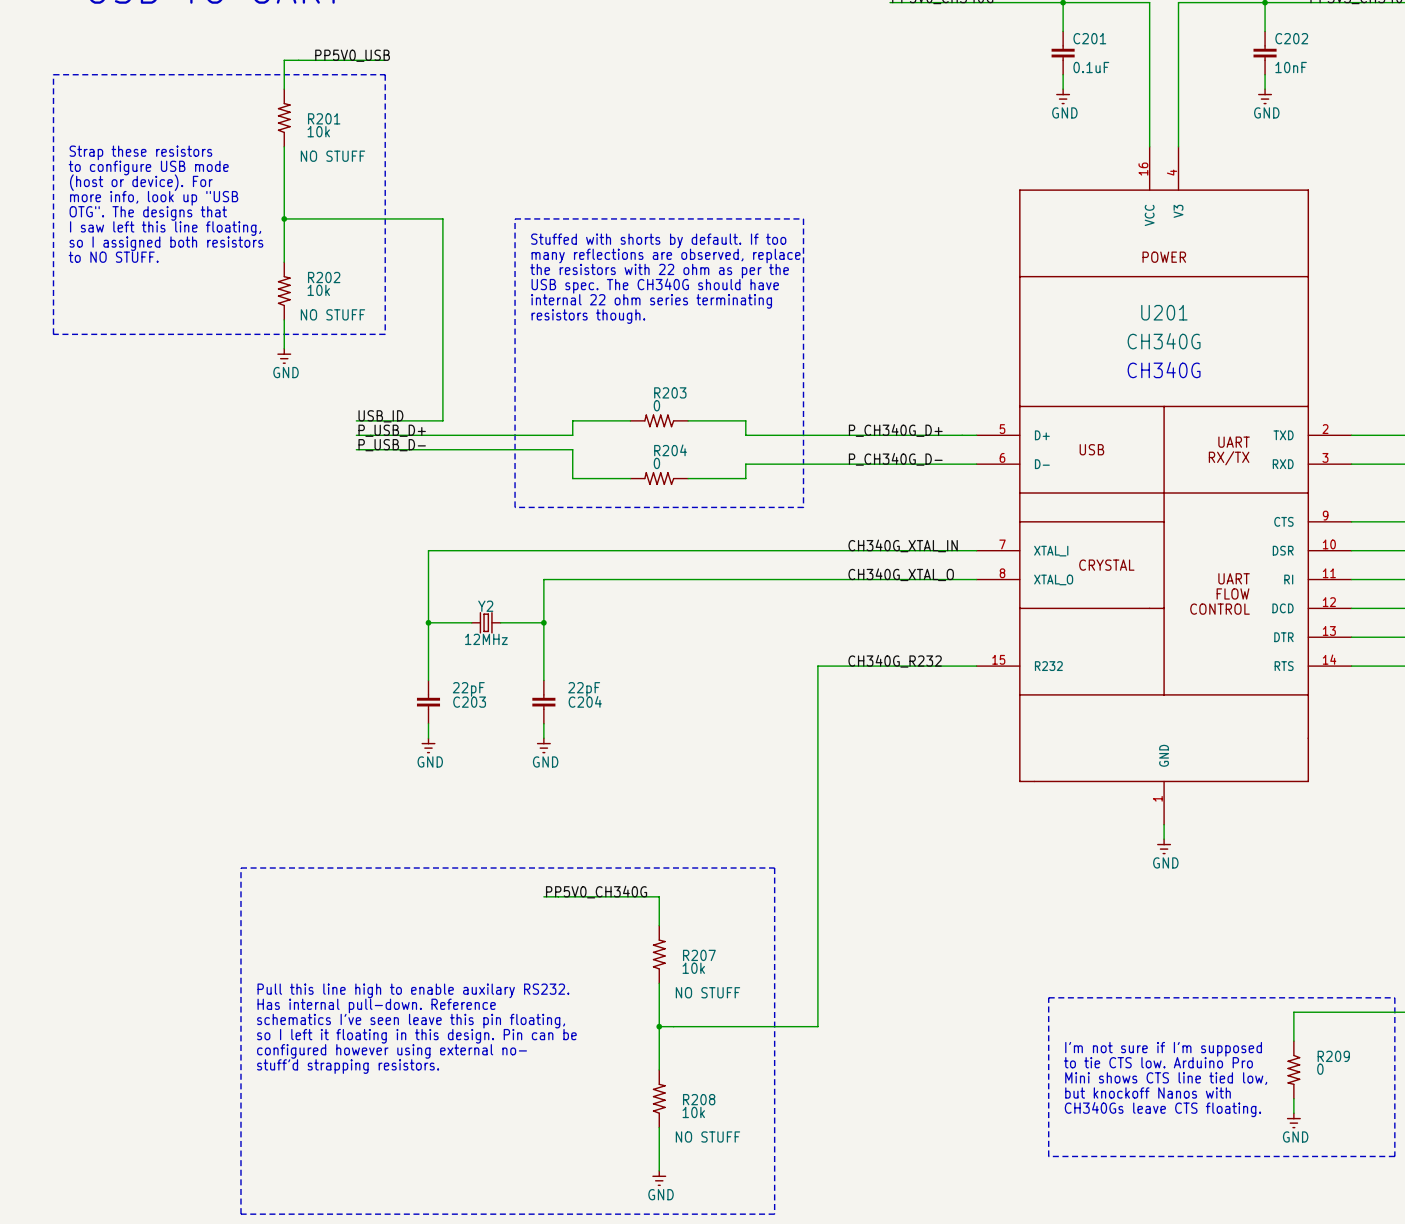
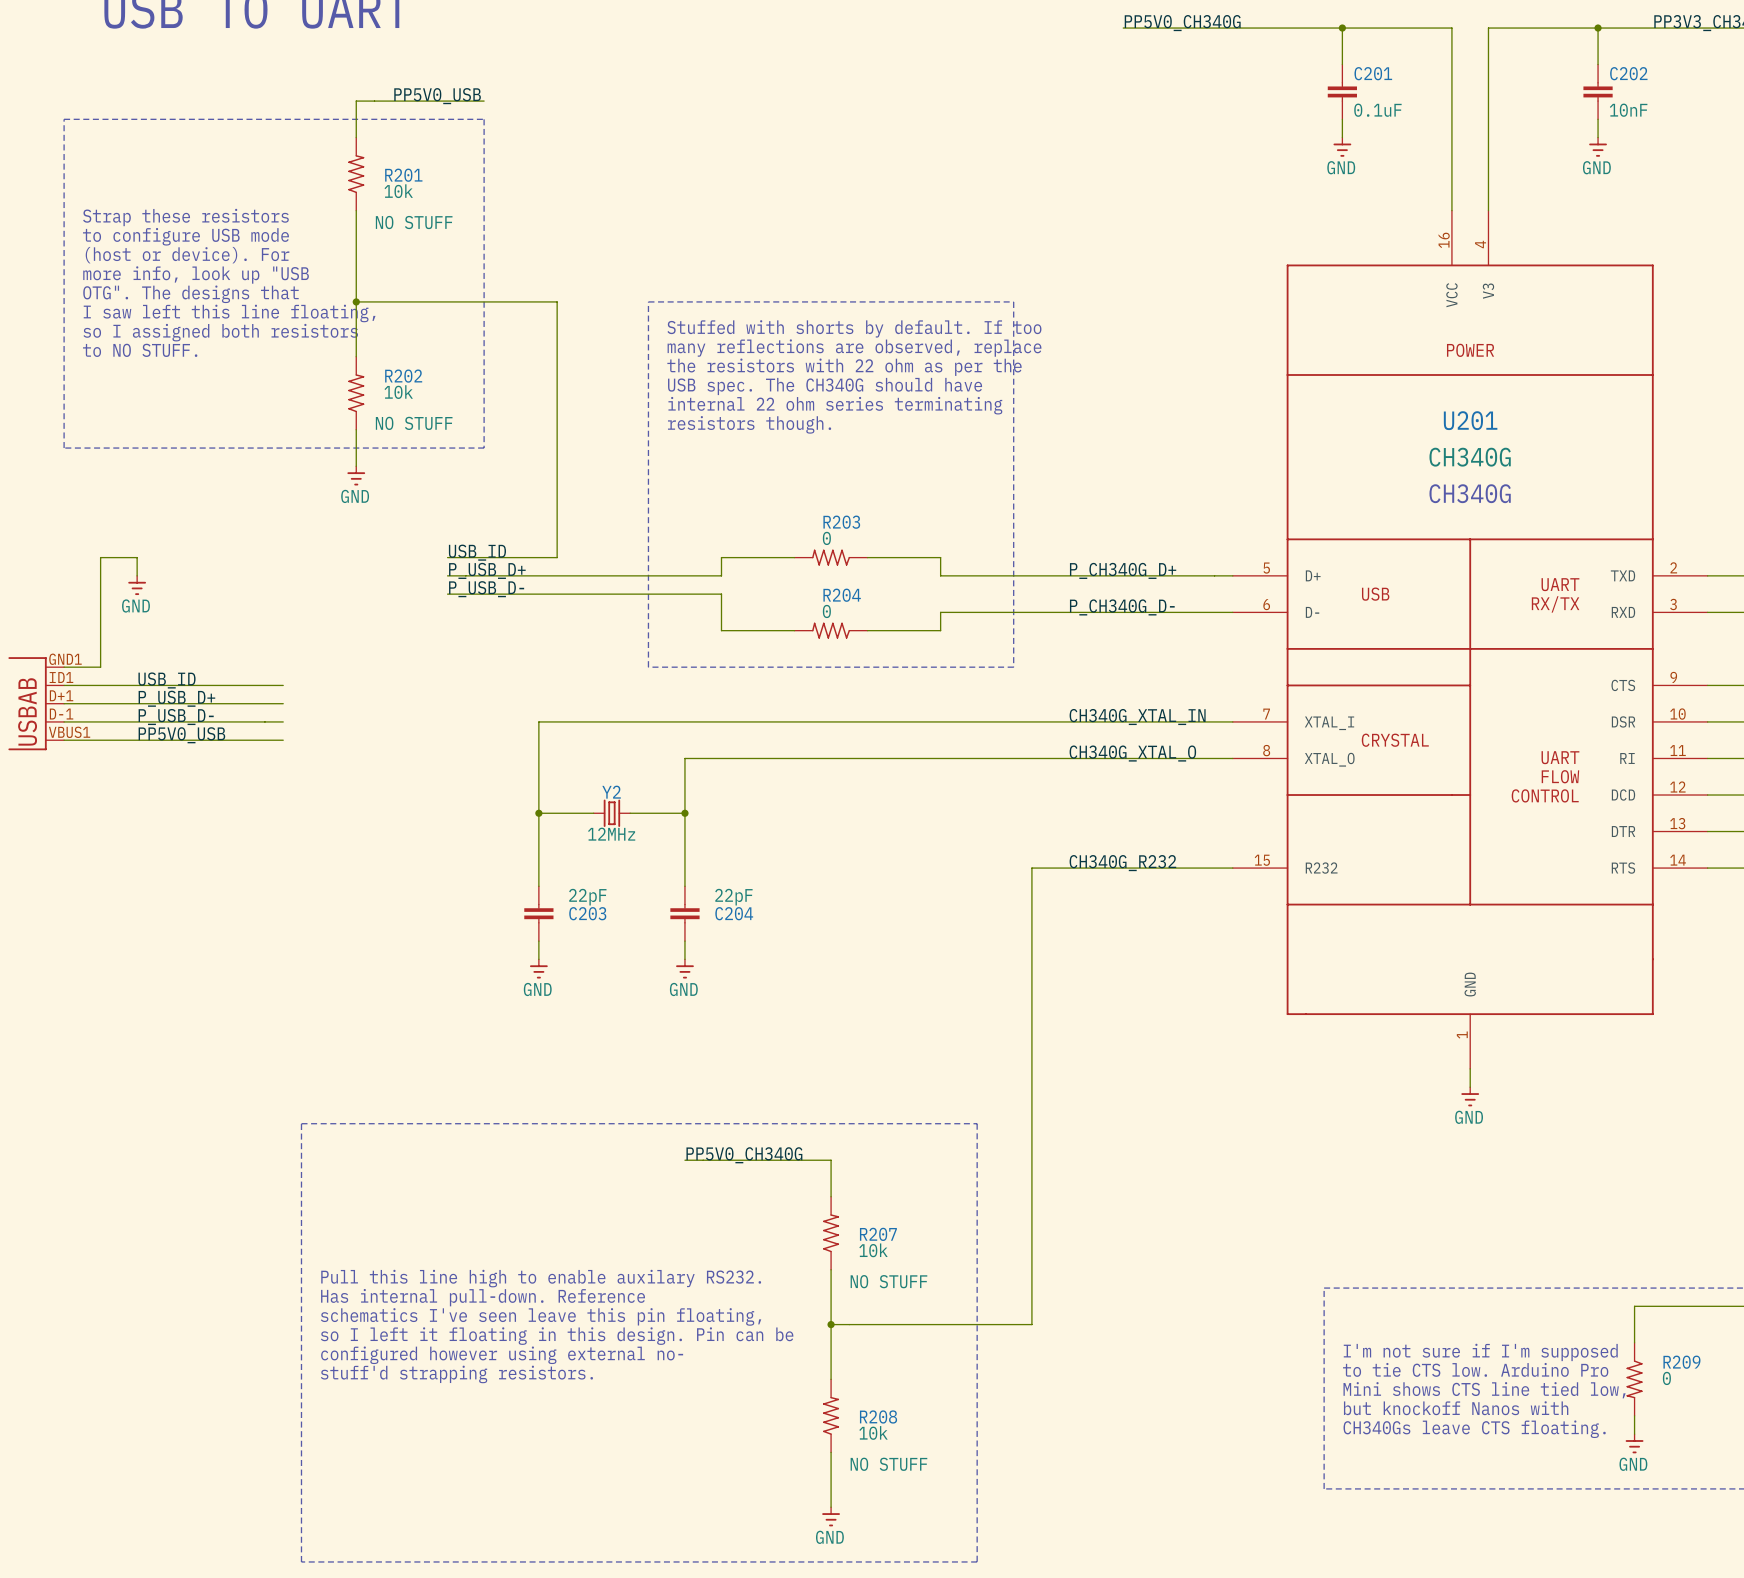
wire: none -> (137, 575) (137, 557) (100, 557) (100, 667) (64, 667)
power symbol: none -> GND (137, 585)
label: none -> USB_ID (167, 680)
wire: none -> (64, 685) (283, 685)
label: none -> P_USB_D+ (176, 698)
part: none -> (36, 703)
wire: none -> (64, 703) (283, 703)
label: none -> P_USB_D- (176, 717)
wire: none -> (64, 721) (283, 721)
label: none -> PP5V0_USB (181, 735)
wire: none -> (64, 740) (283, 740)

